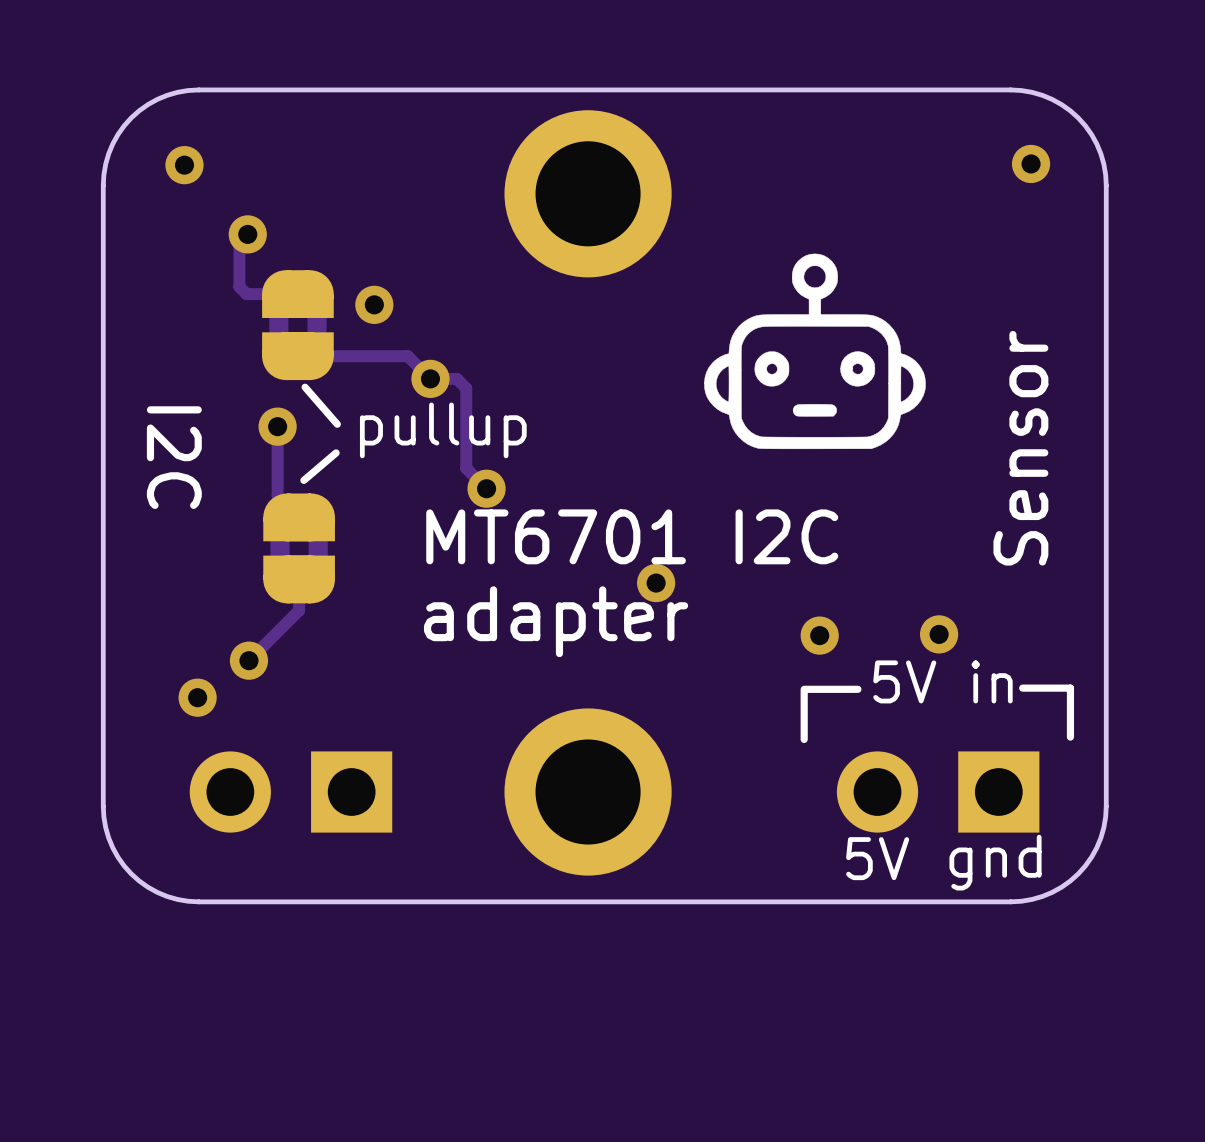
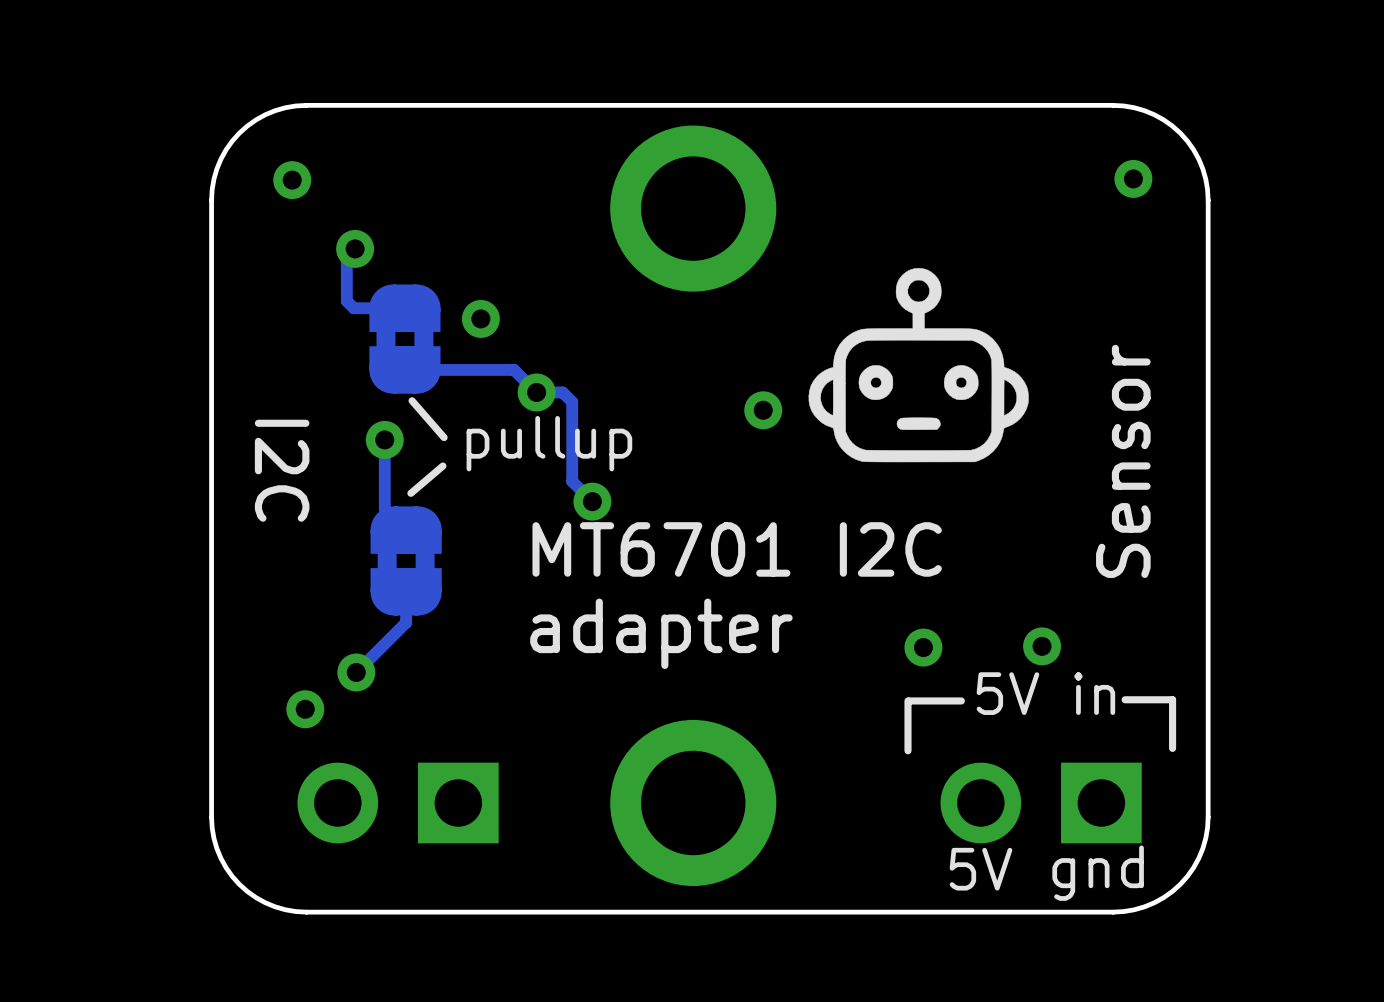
via position: (656, 583) -> (763, 410)

